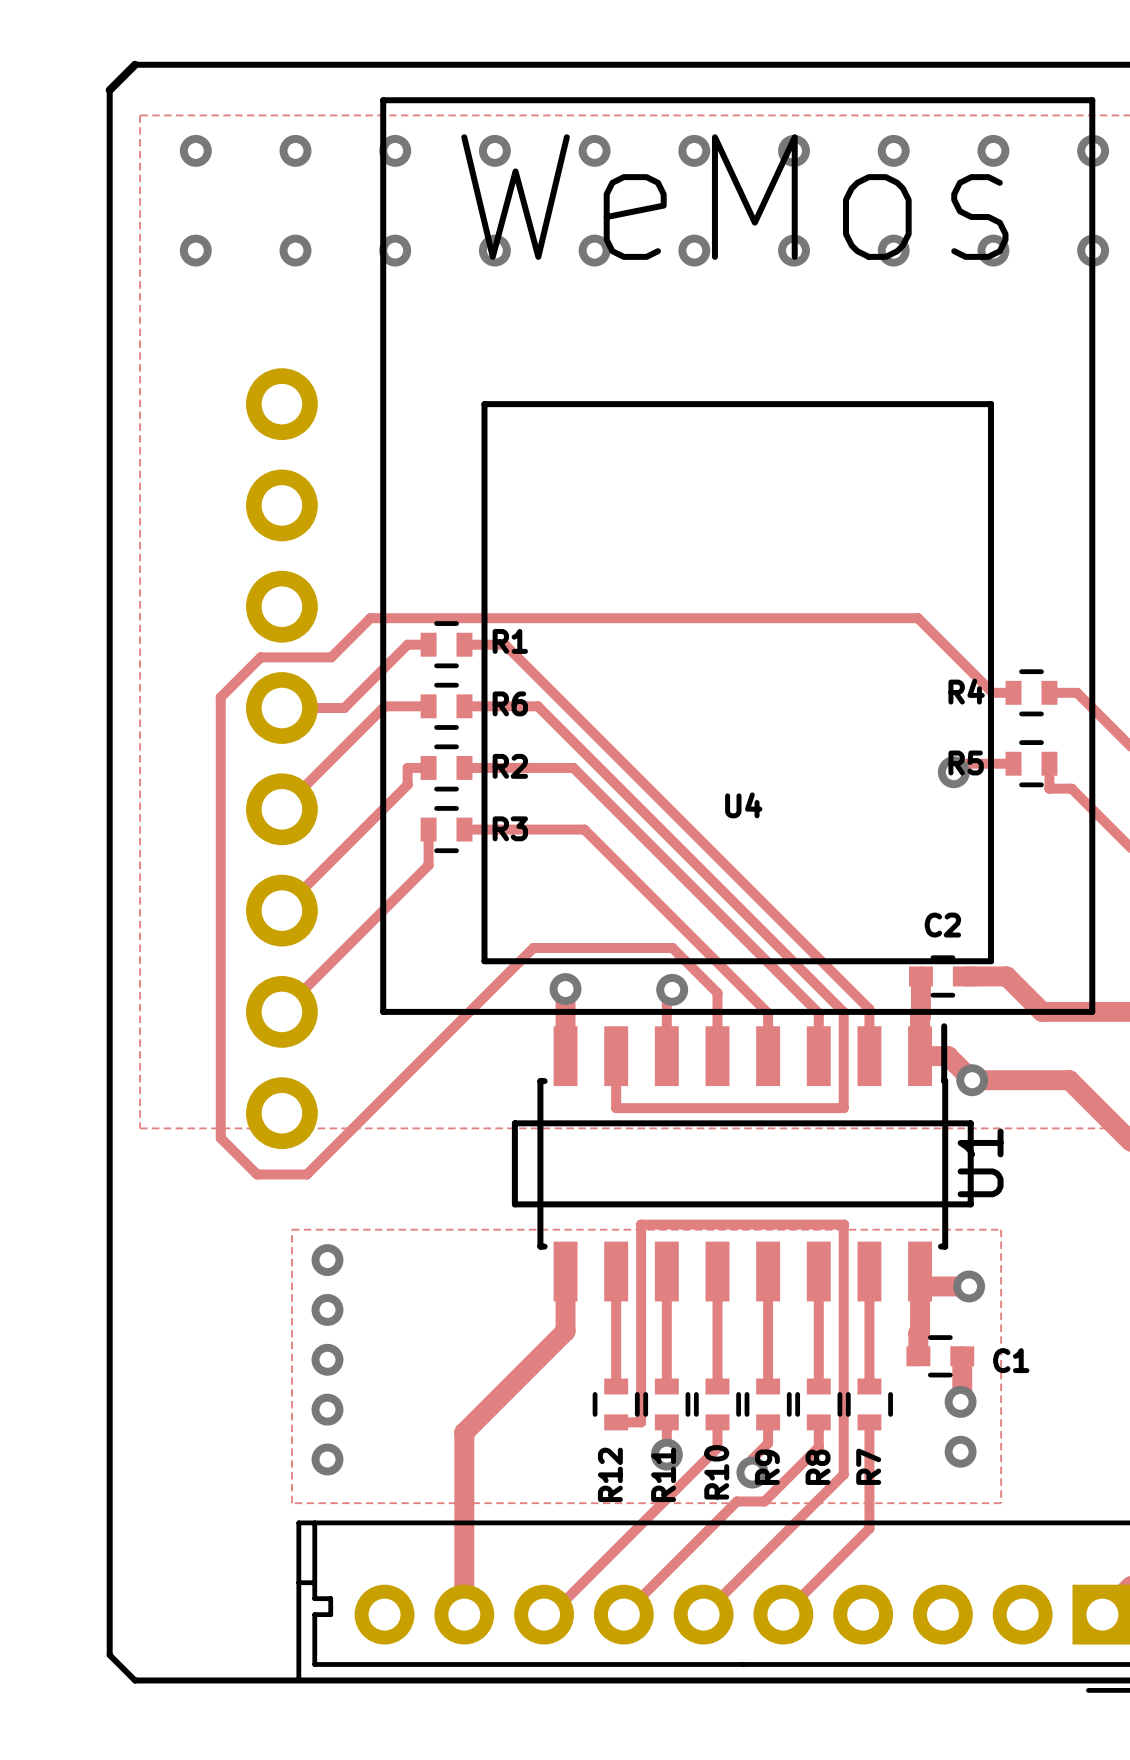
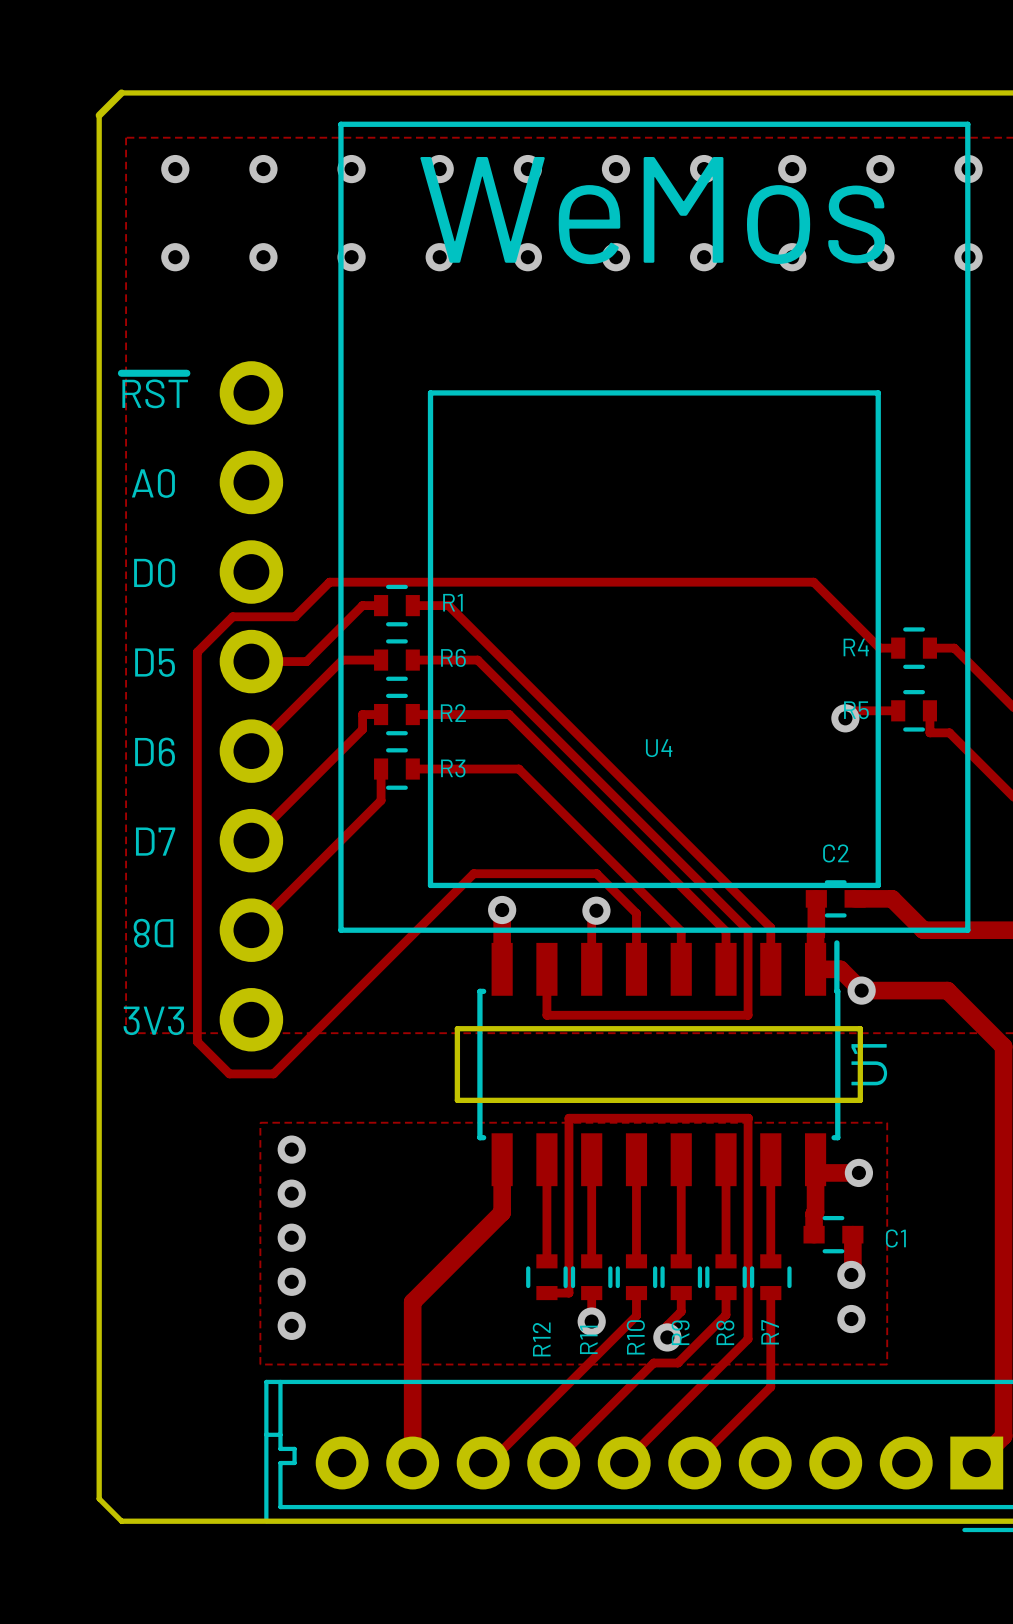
text: none -> ~{RST} (154, 390)
text: none -> A0 (153, 483)
text: none -> D0 (154, 572)
text: none -> D5 (155, 662)
text: none -> D6 (155, 752)
text: none -> D7 (155, 841)
text: none -> D8 (153, 933)
text: none -> 3V3 (153, 1020)

